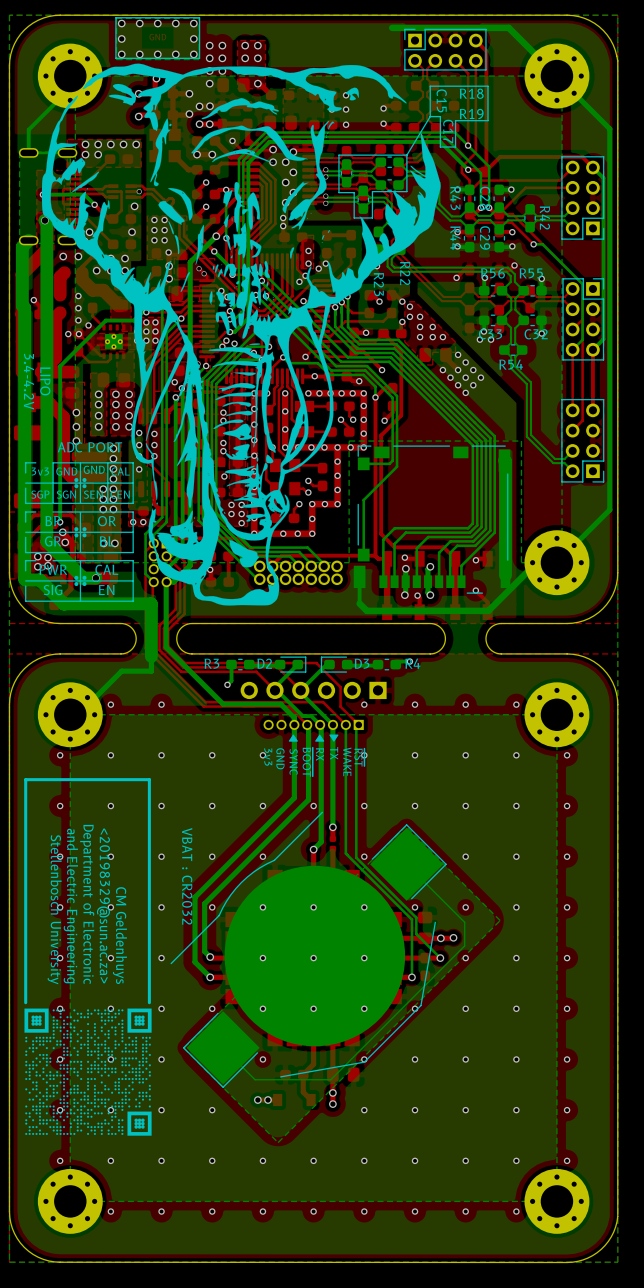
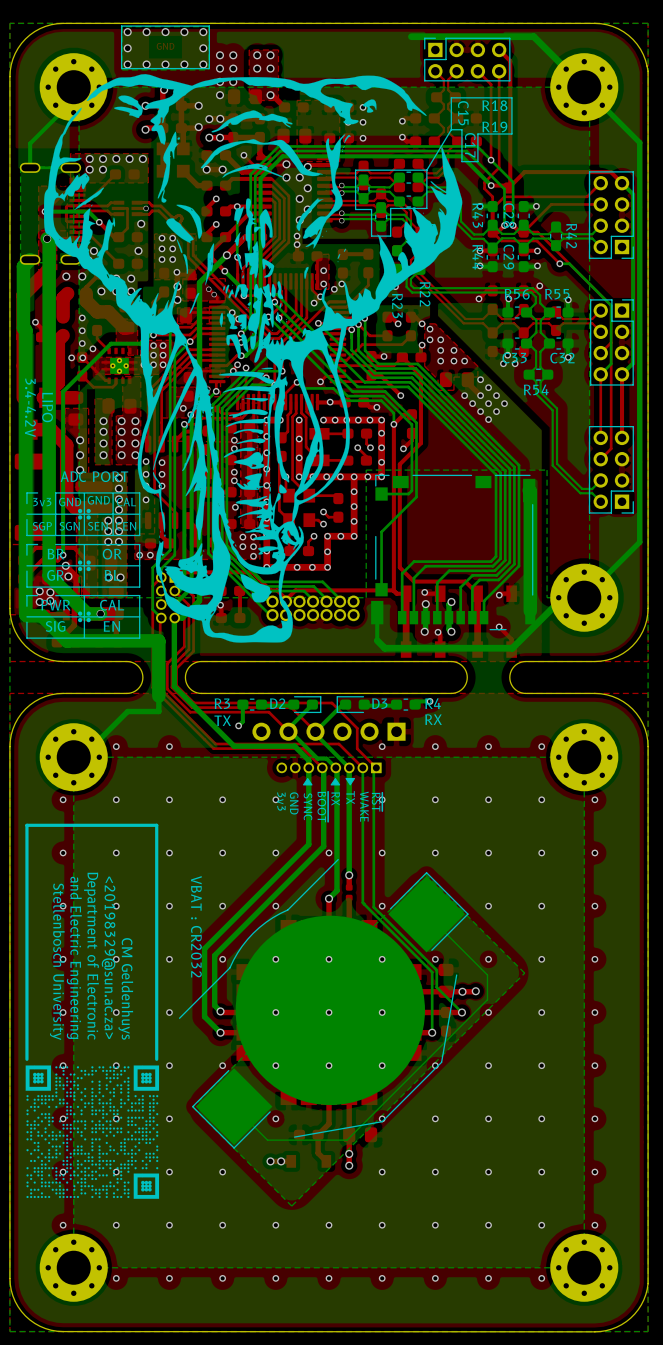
text: none -> RX (433, 719)
text: none -> TX (222, 720)

